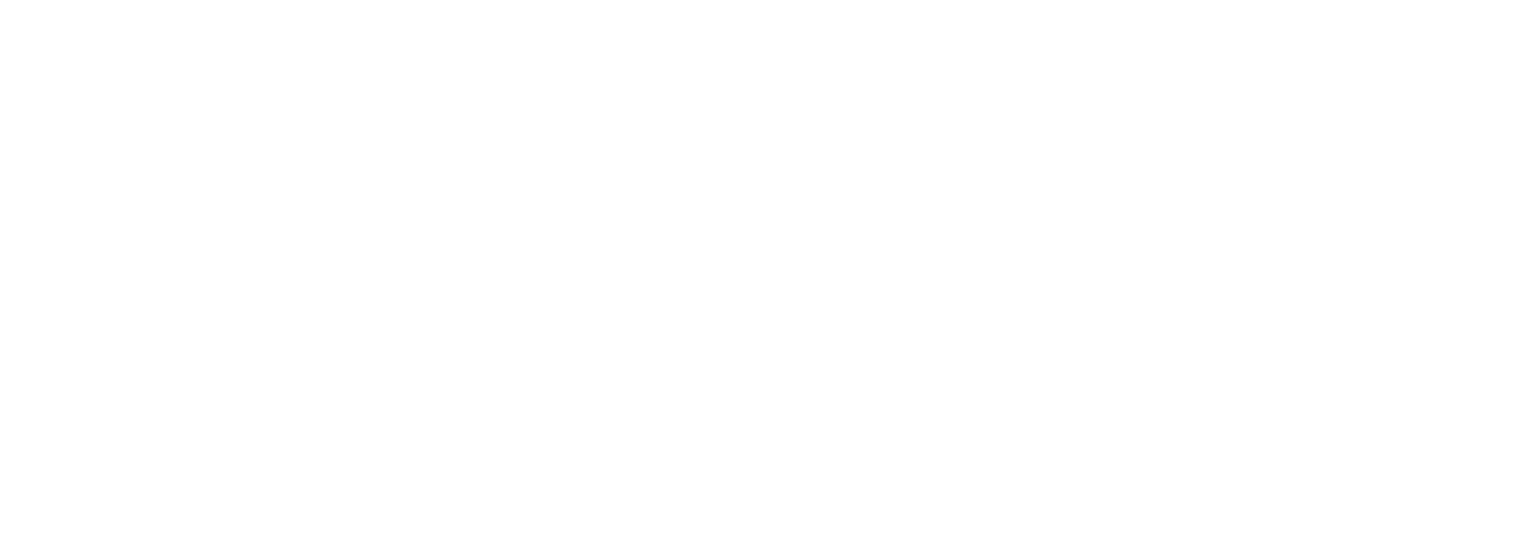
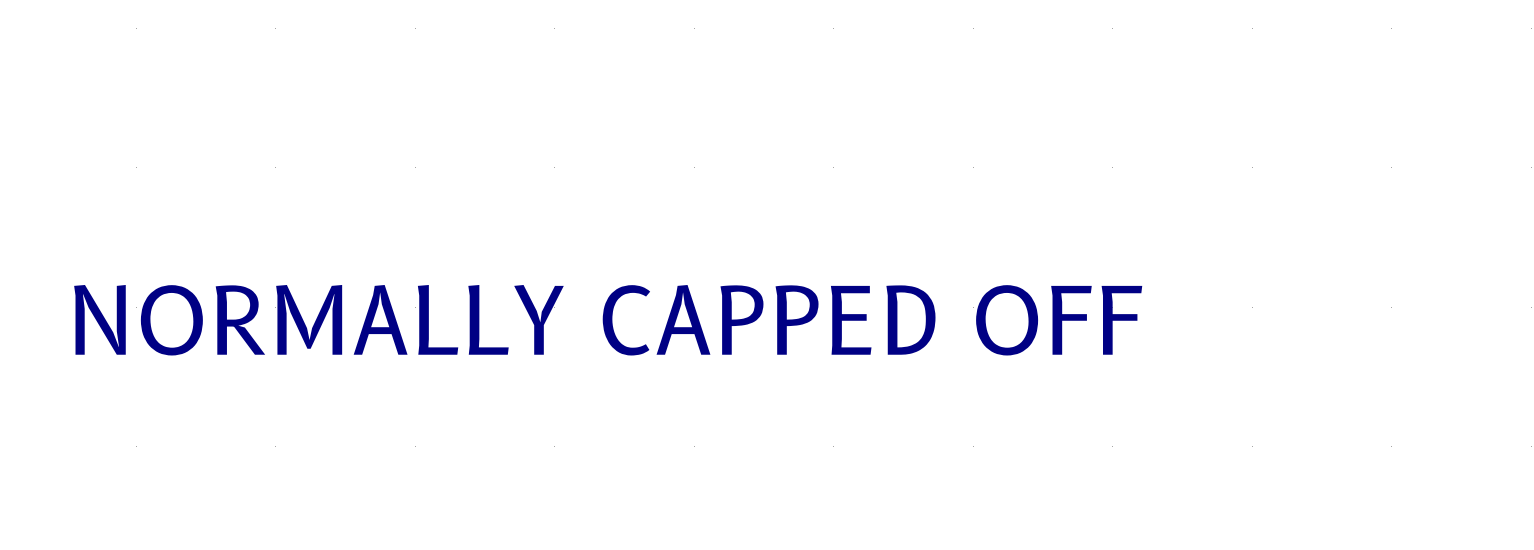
text: none -> NORMALLY CAPPED OFF (608, 320)

